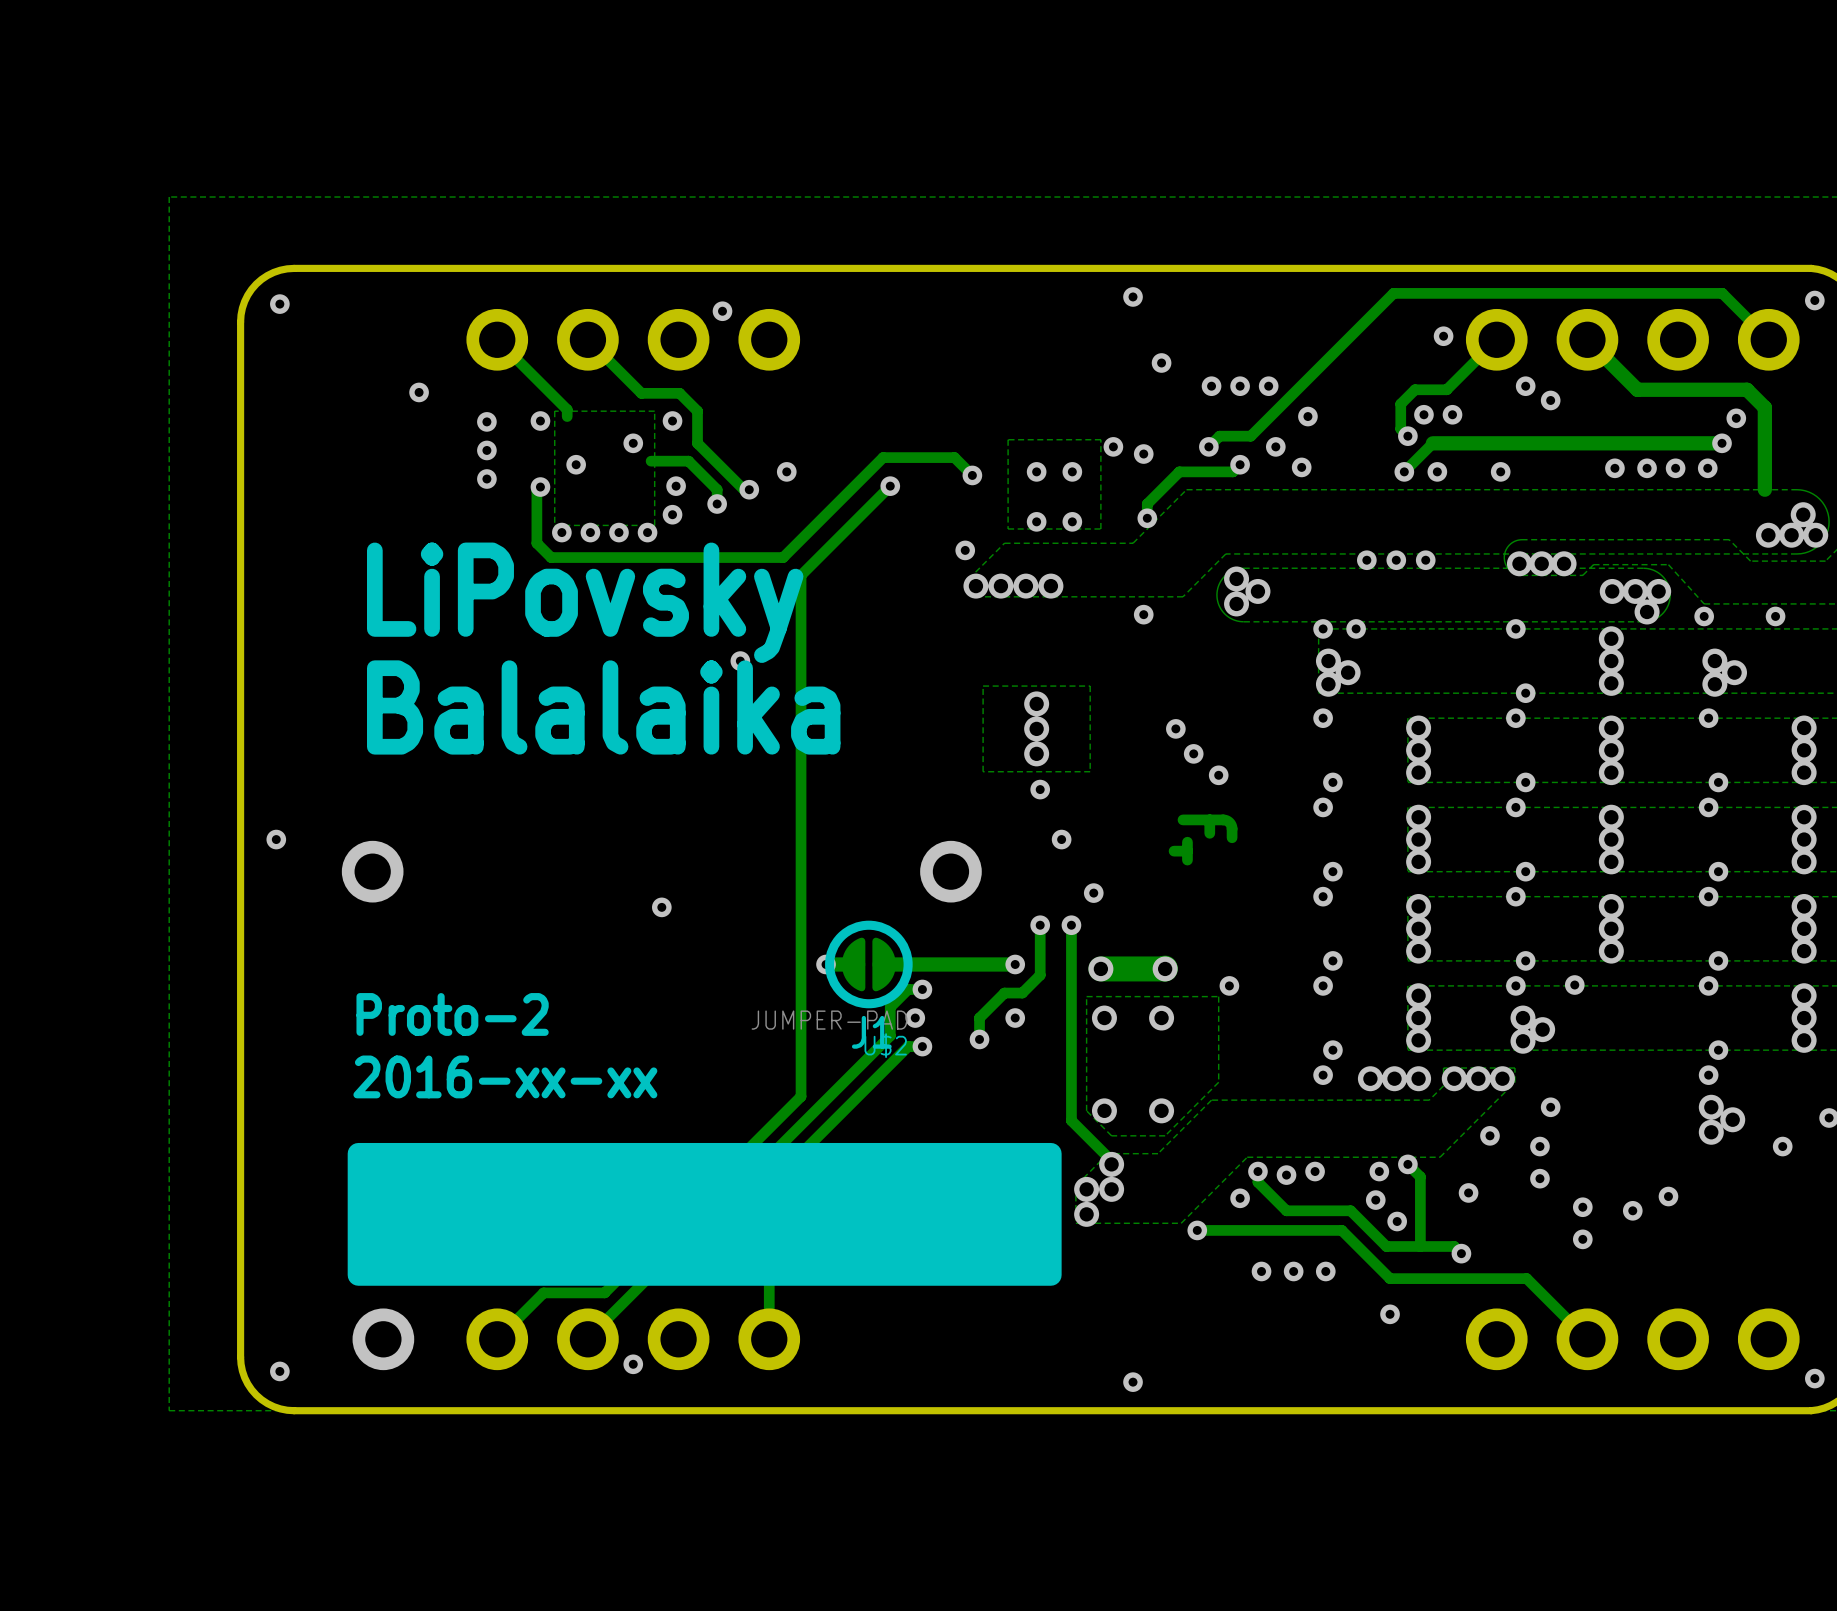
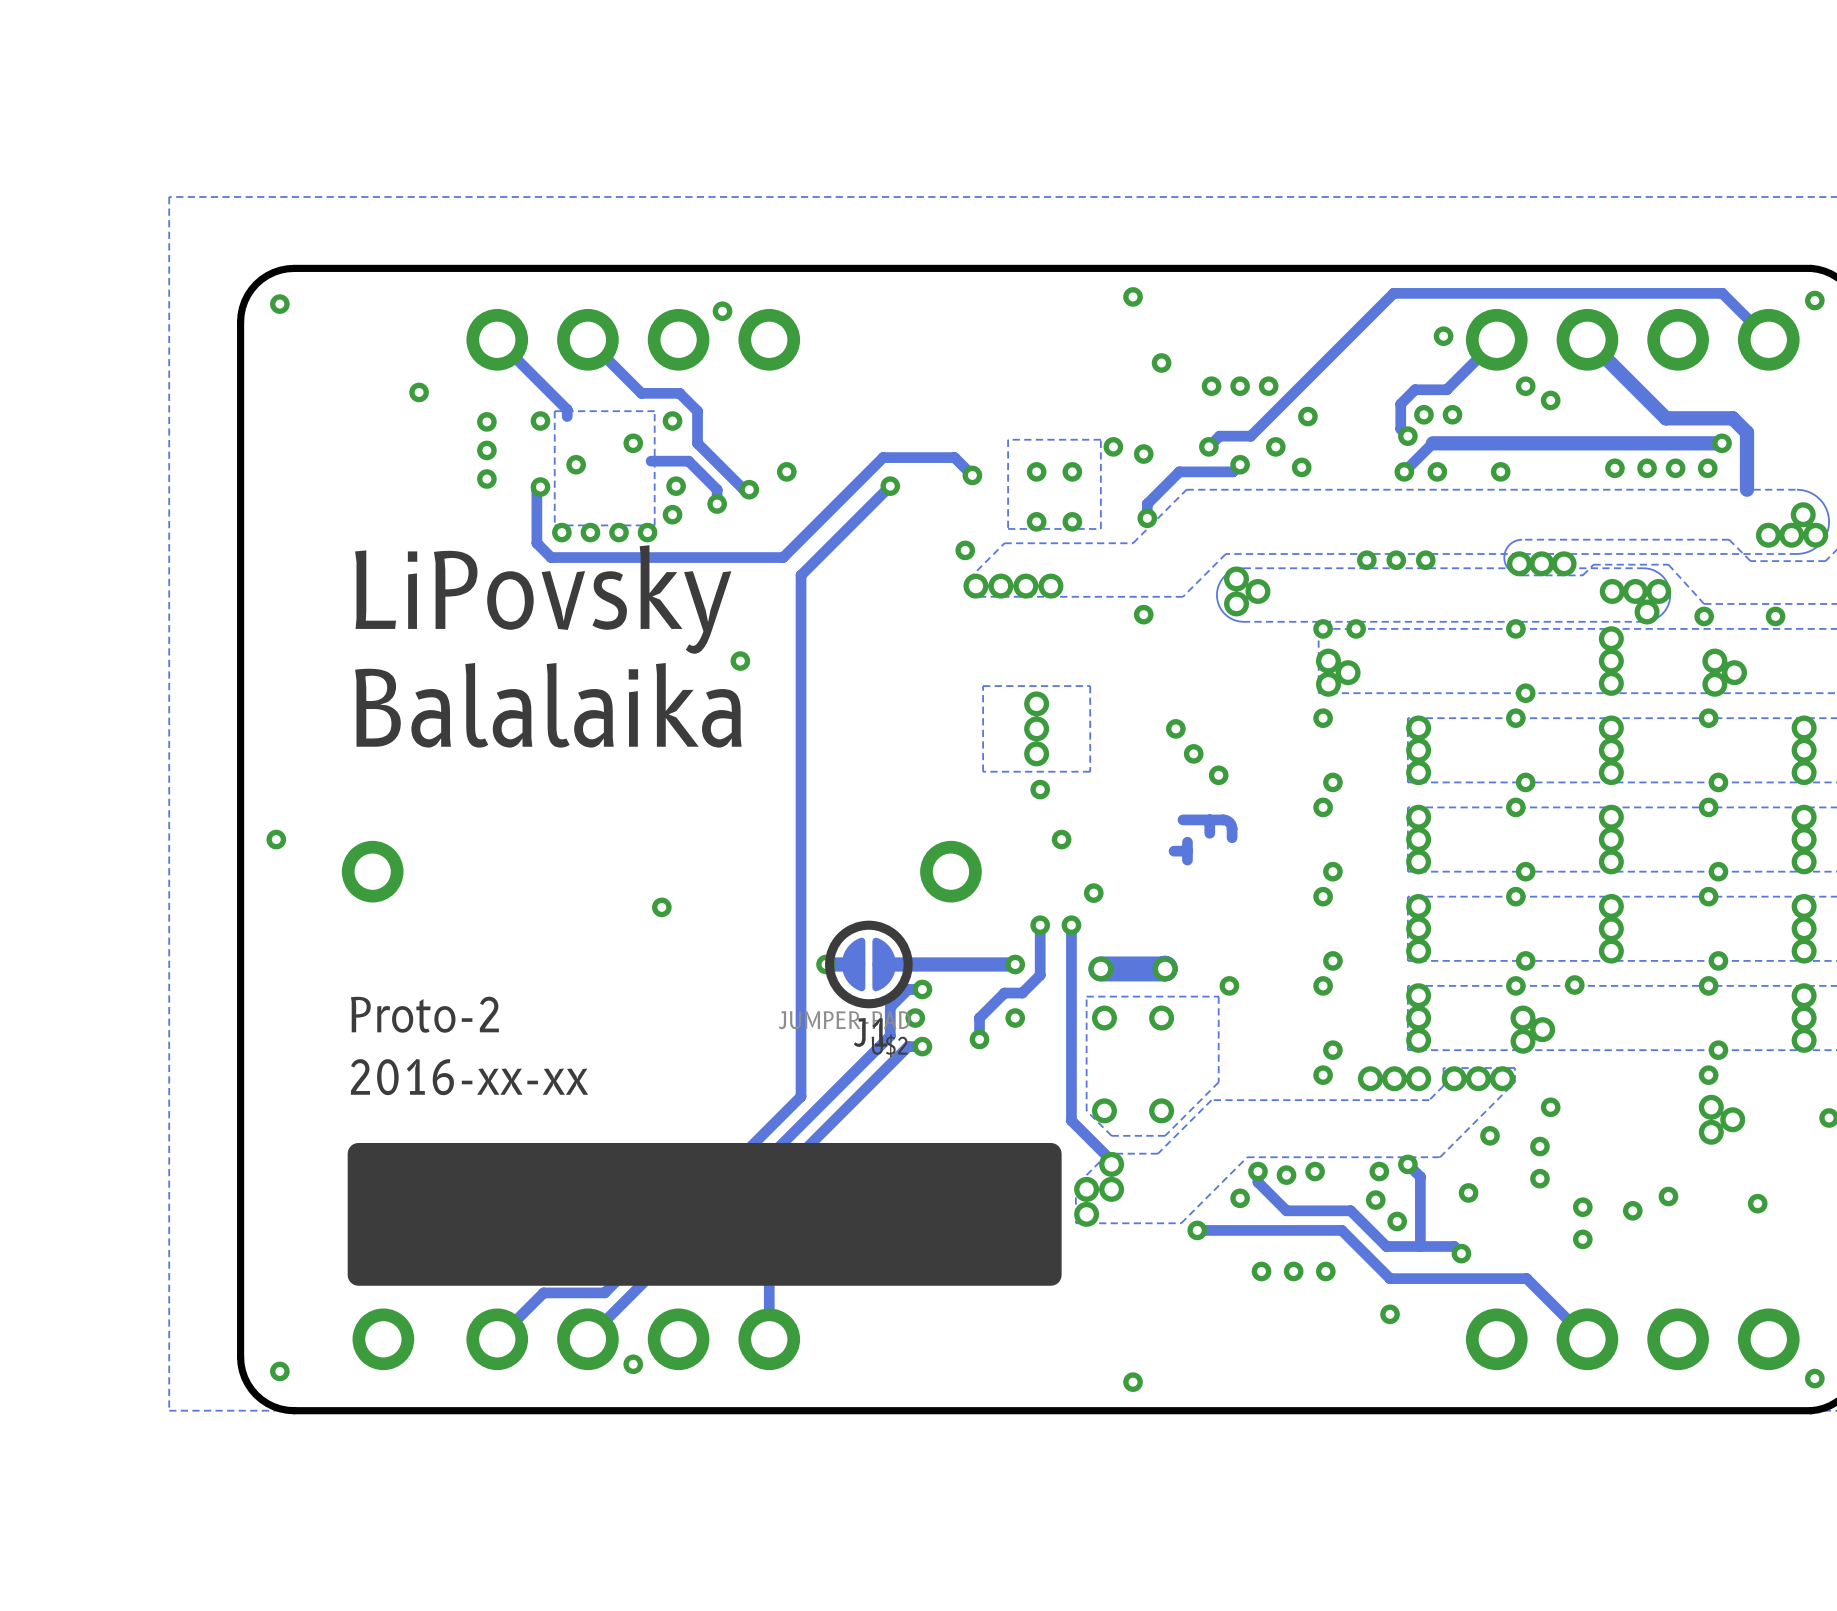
track: (1637, 389) (1747, 389) (1764, 407) (1764, 489) -> (1637, 389) (1665, 418) (1732, 418) (1747, 432) (1747, 489)
via: (1736, 418) -> none
via: (1782, 1146) -> none
via: none -> (1757, 1203)

